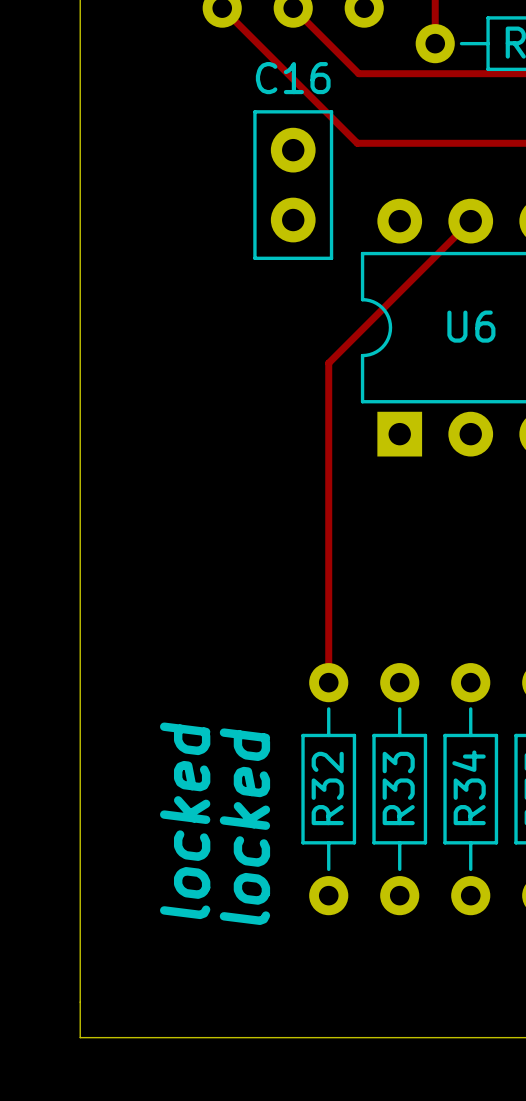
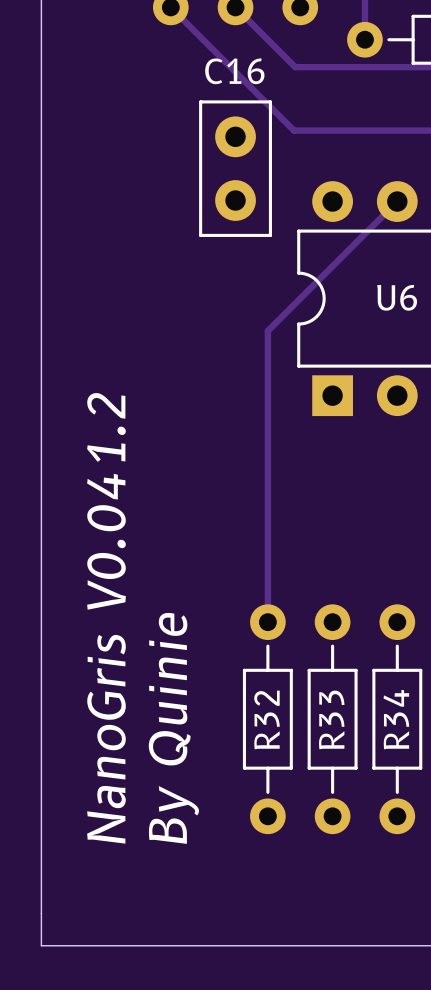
text: none -> NanoGris V0.041.2 (106, 618)
text: none -> By Quinie (173, 728)
text: locked (185, 820) -> none
text: locked (244, 826) -> none

